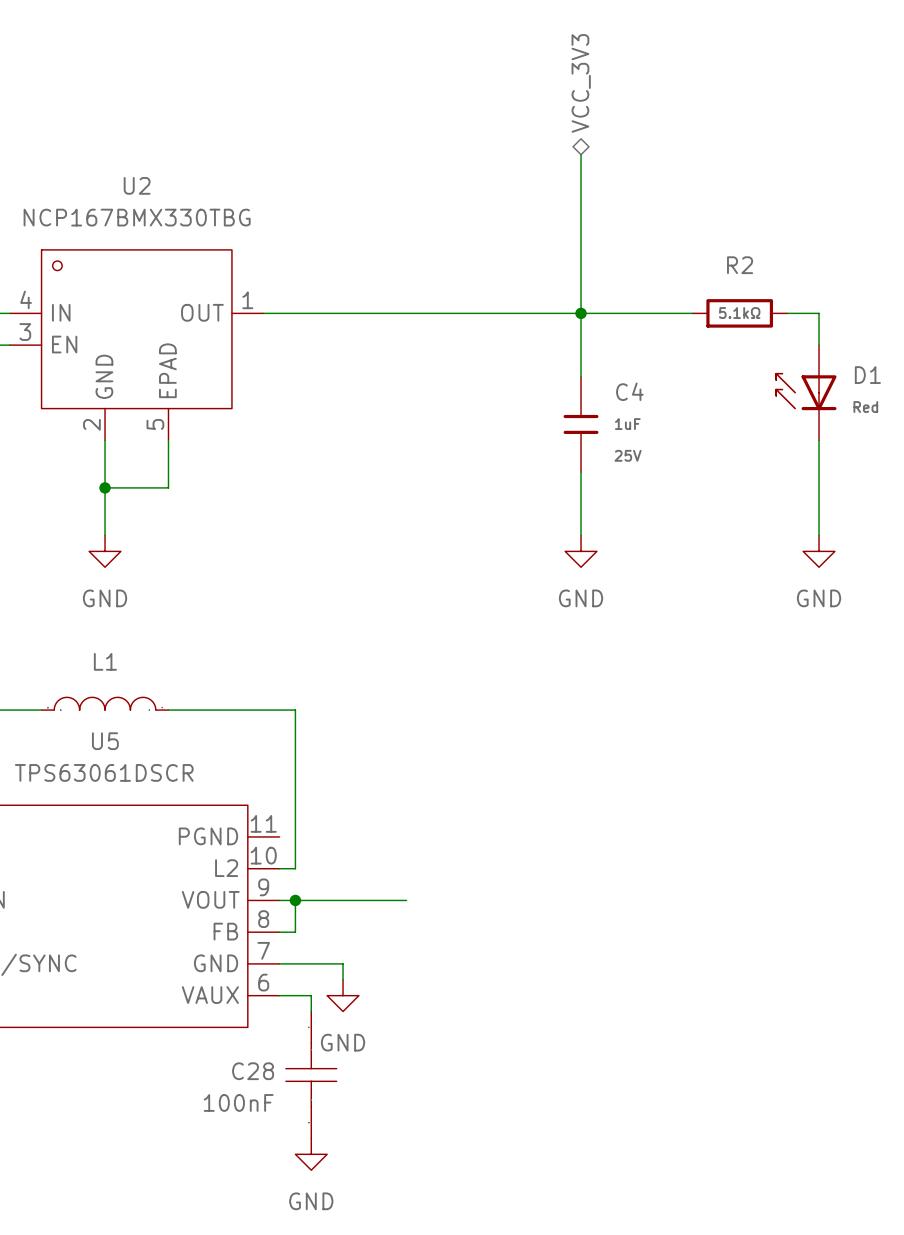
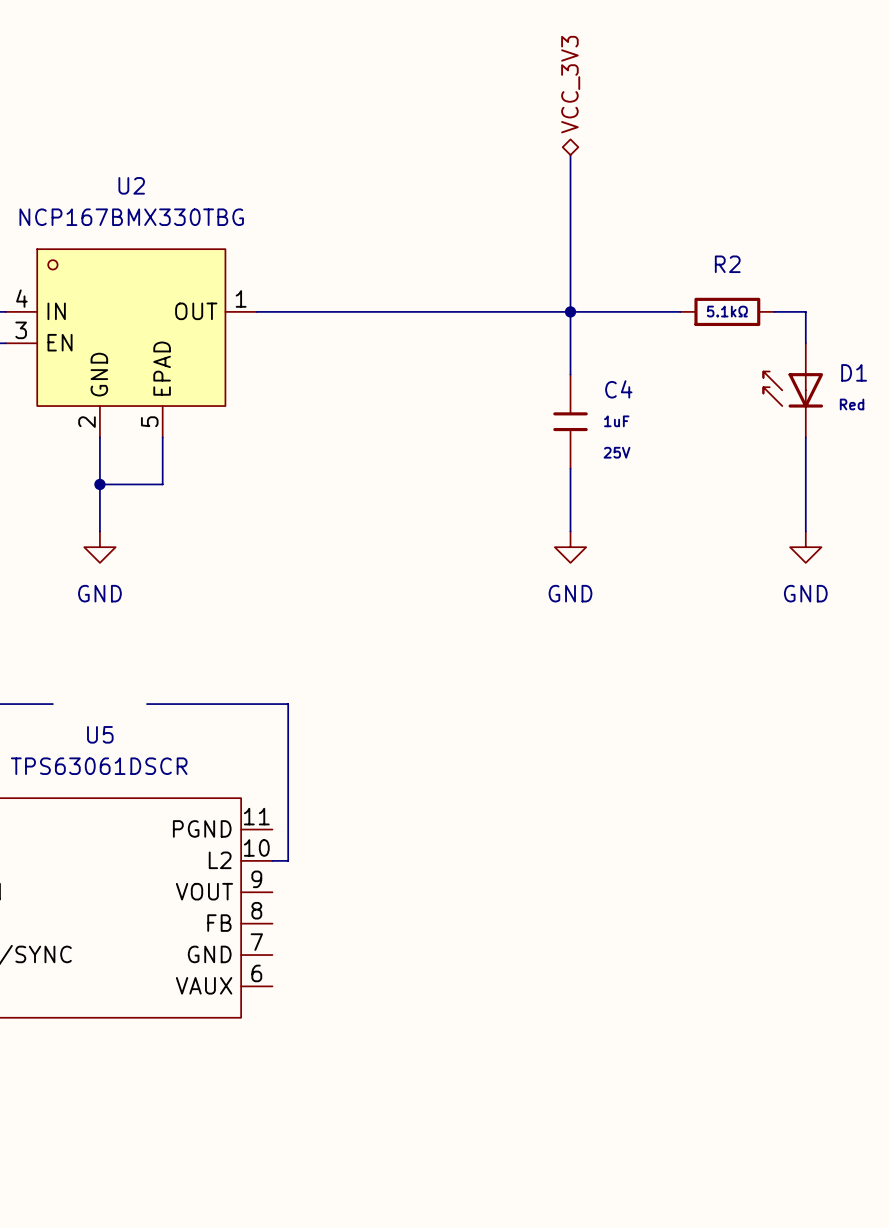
L1: (105, 703) -> none
wire: (279, 900) (406, 900) -> none
wire: (295, 900) (295, 932) (279, 932) -> none
junction: (295, 900) -> none
wire: (279, 963) (343, 963) (343, 979) -> none
wire: (279, 995) (311, 995) (311, 1011) -> none
power symbol: GND (343, 995) -> none
C28: 100nF (311, 1074) -> none
power symbol: GND (311, 1154) -> none

